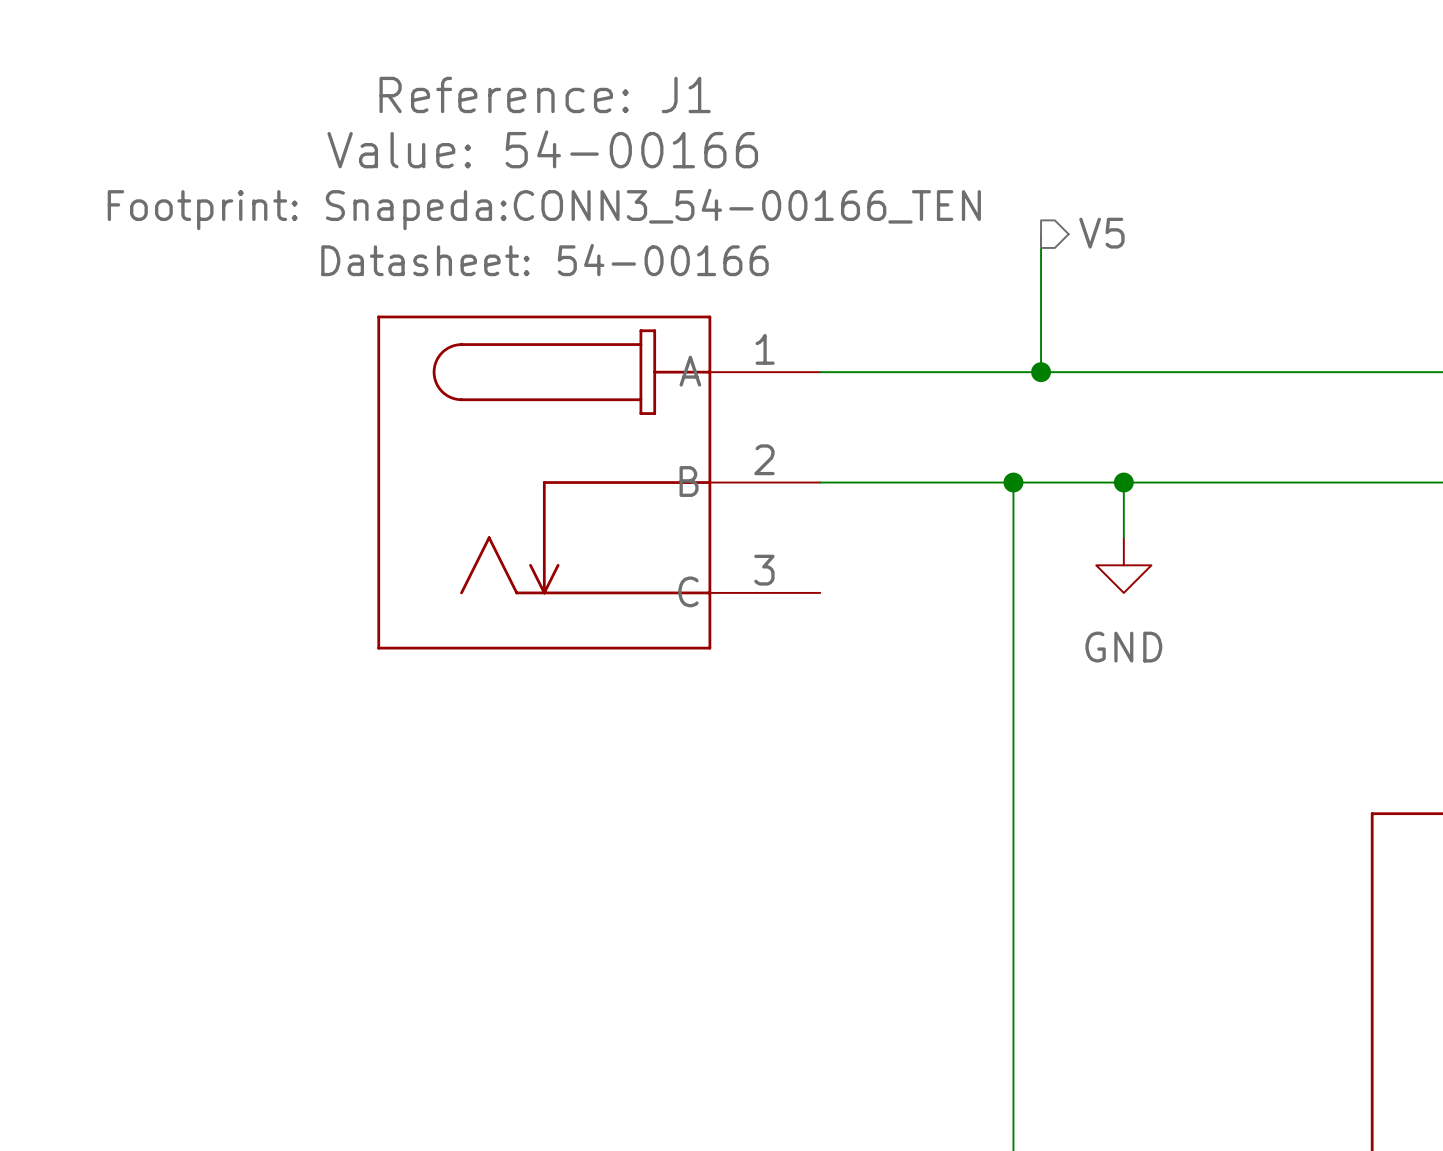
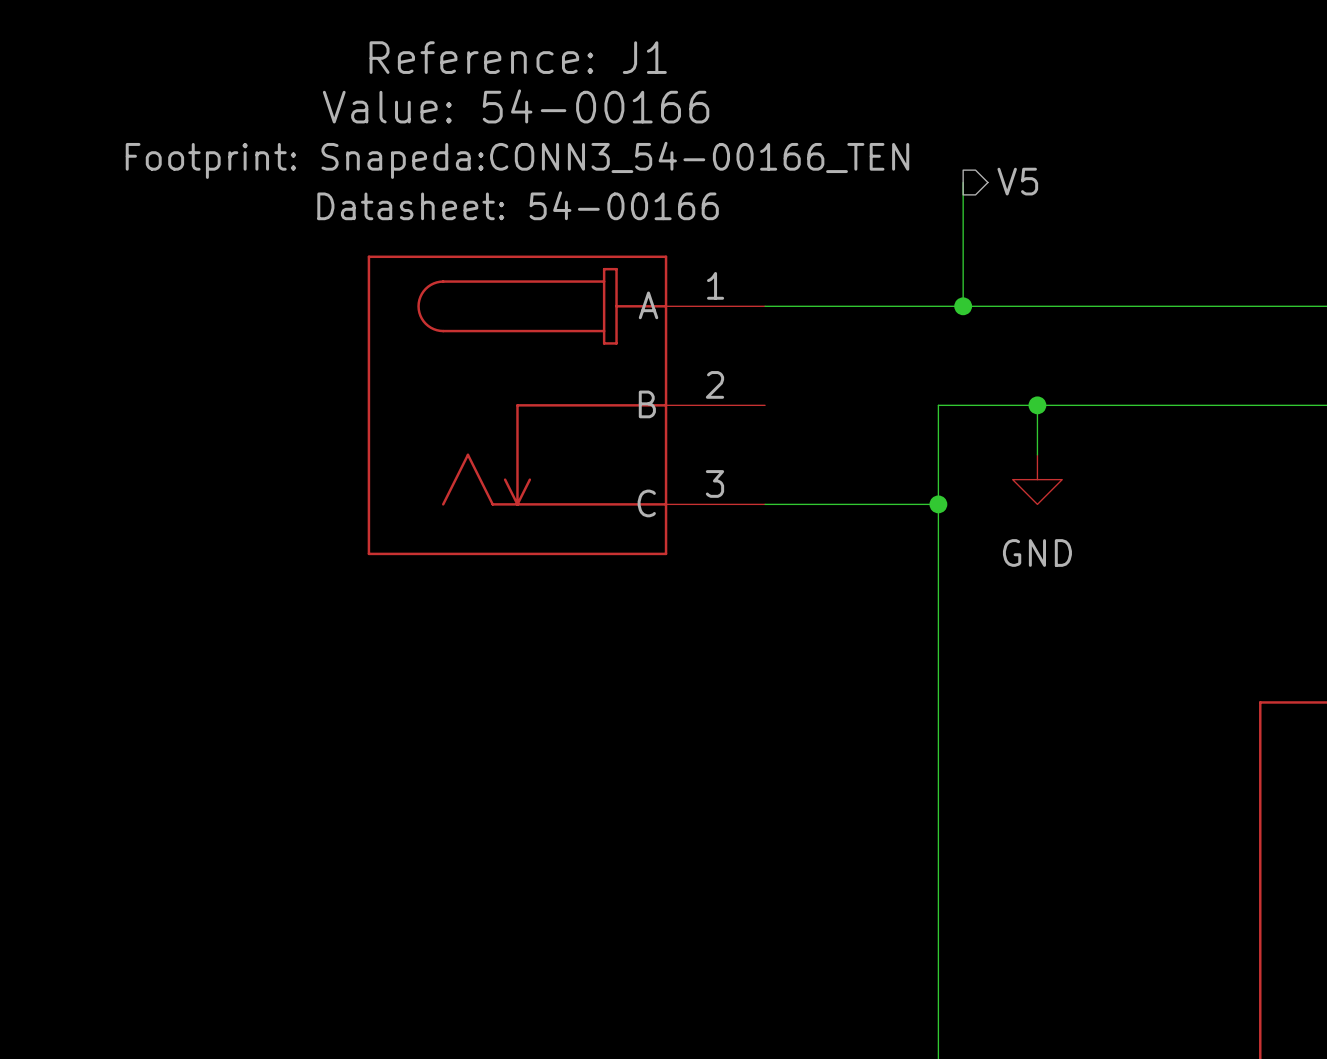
wire: (820, 482) (1013, 482) -> (765, 504) (938, 504)
junction position: (1013, 482) -> (938, 504)

